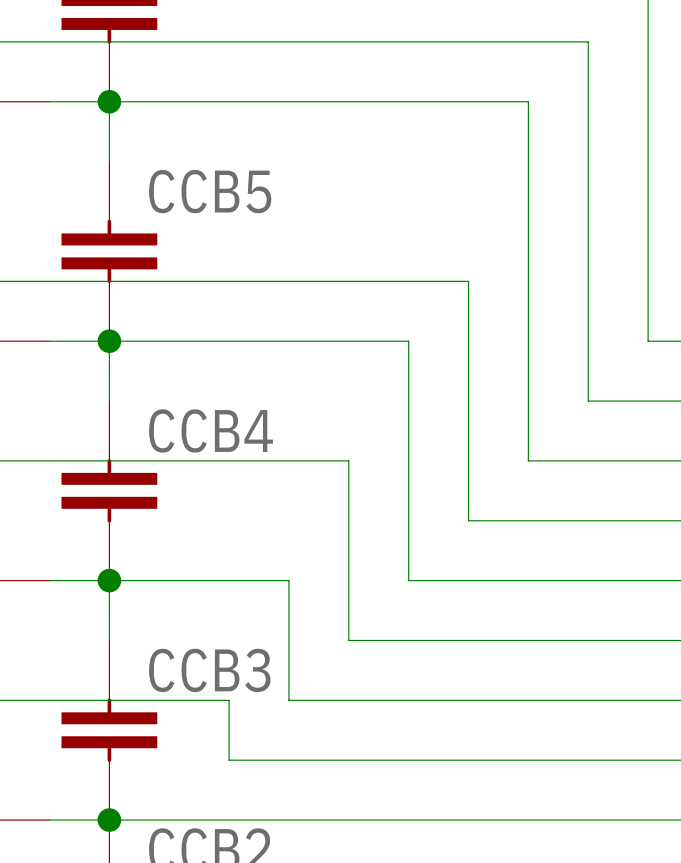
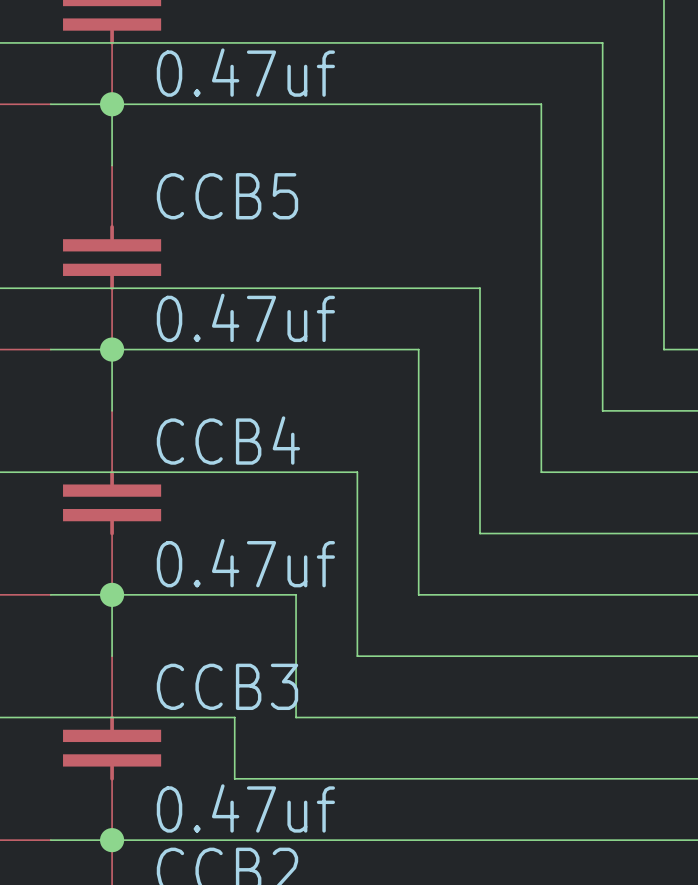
part value: none -> 0.47uf (245, 72)
CCB5 value: none -> 0.47uf (245, 317)
CCB4 value: none -> 0.47uf (245, 563)
CCB3 value: none -> 0.47uf (245, 808)

